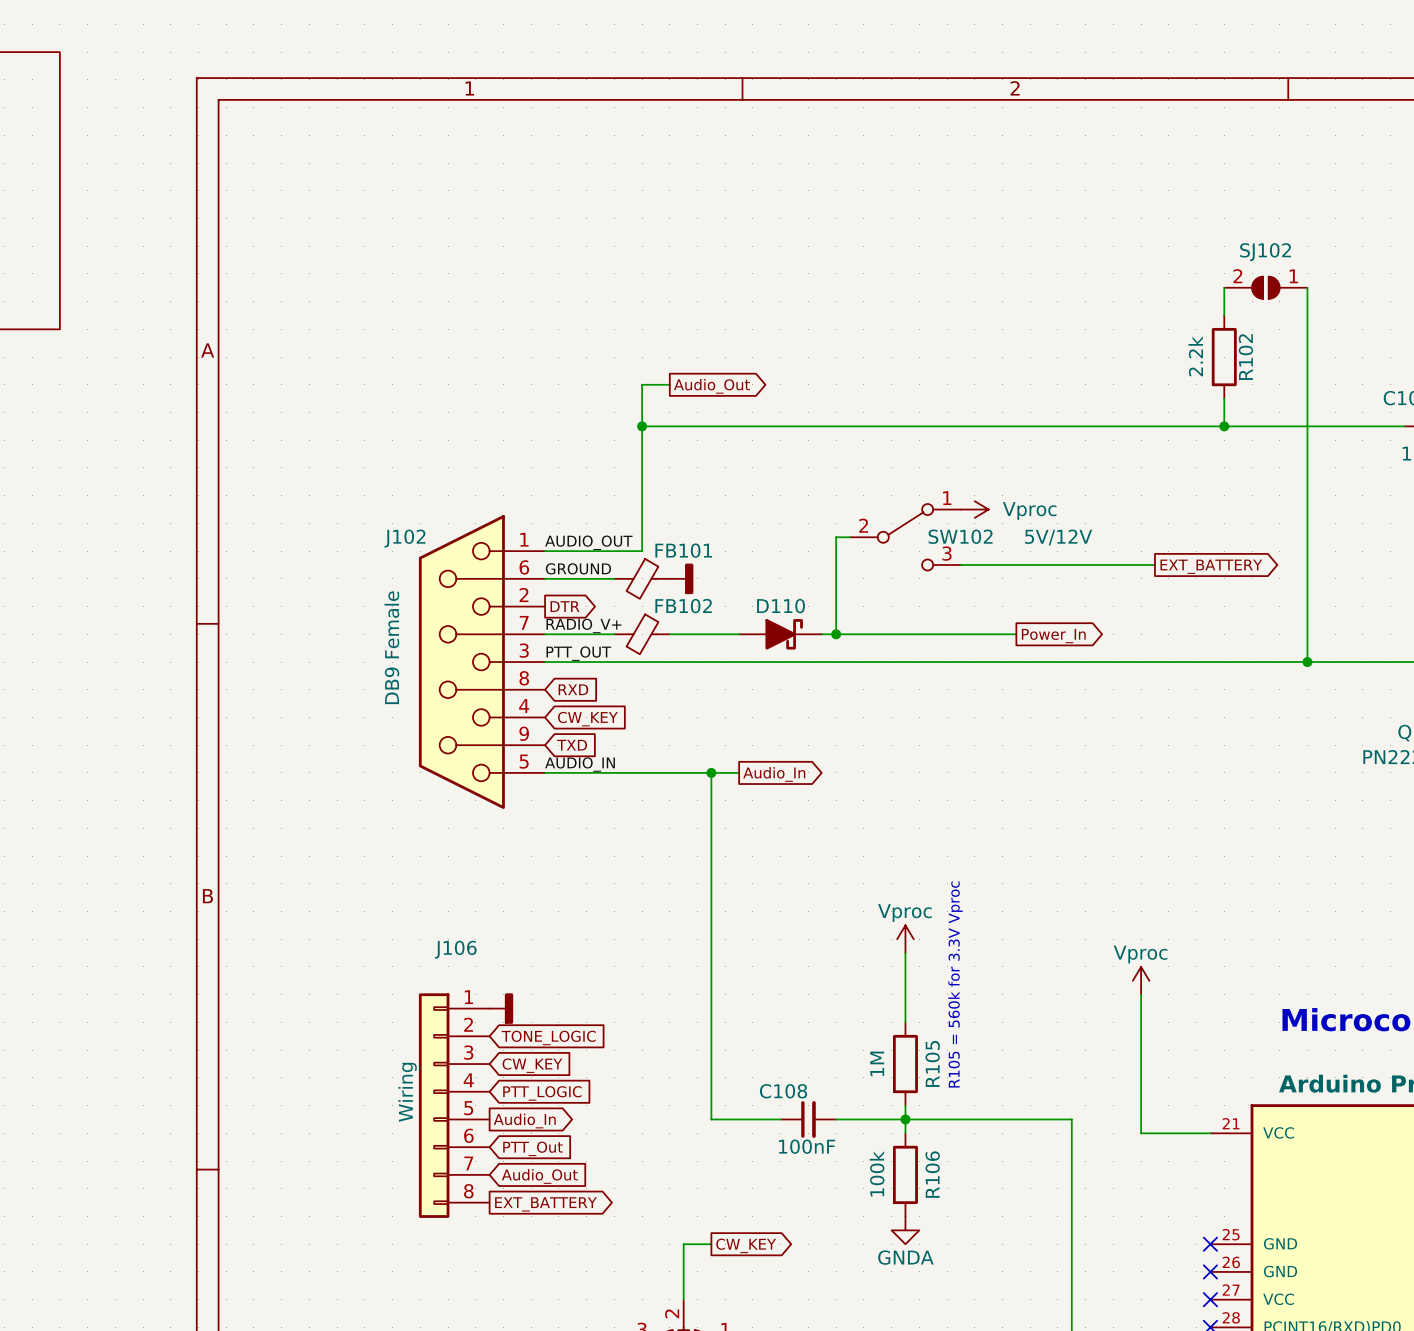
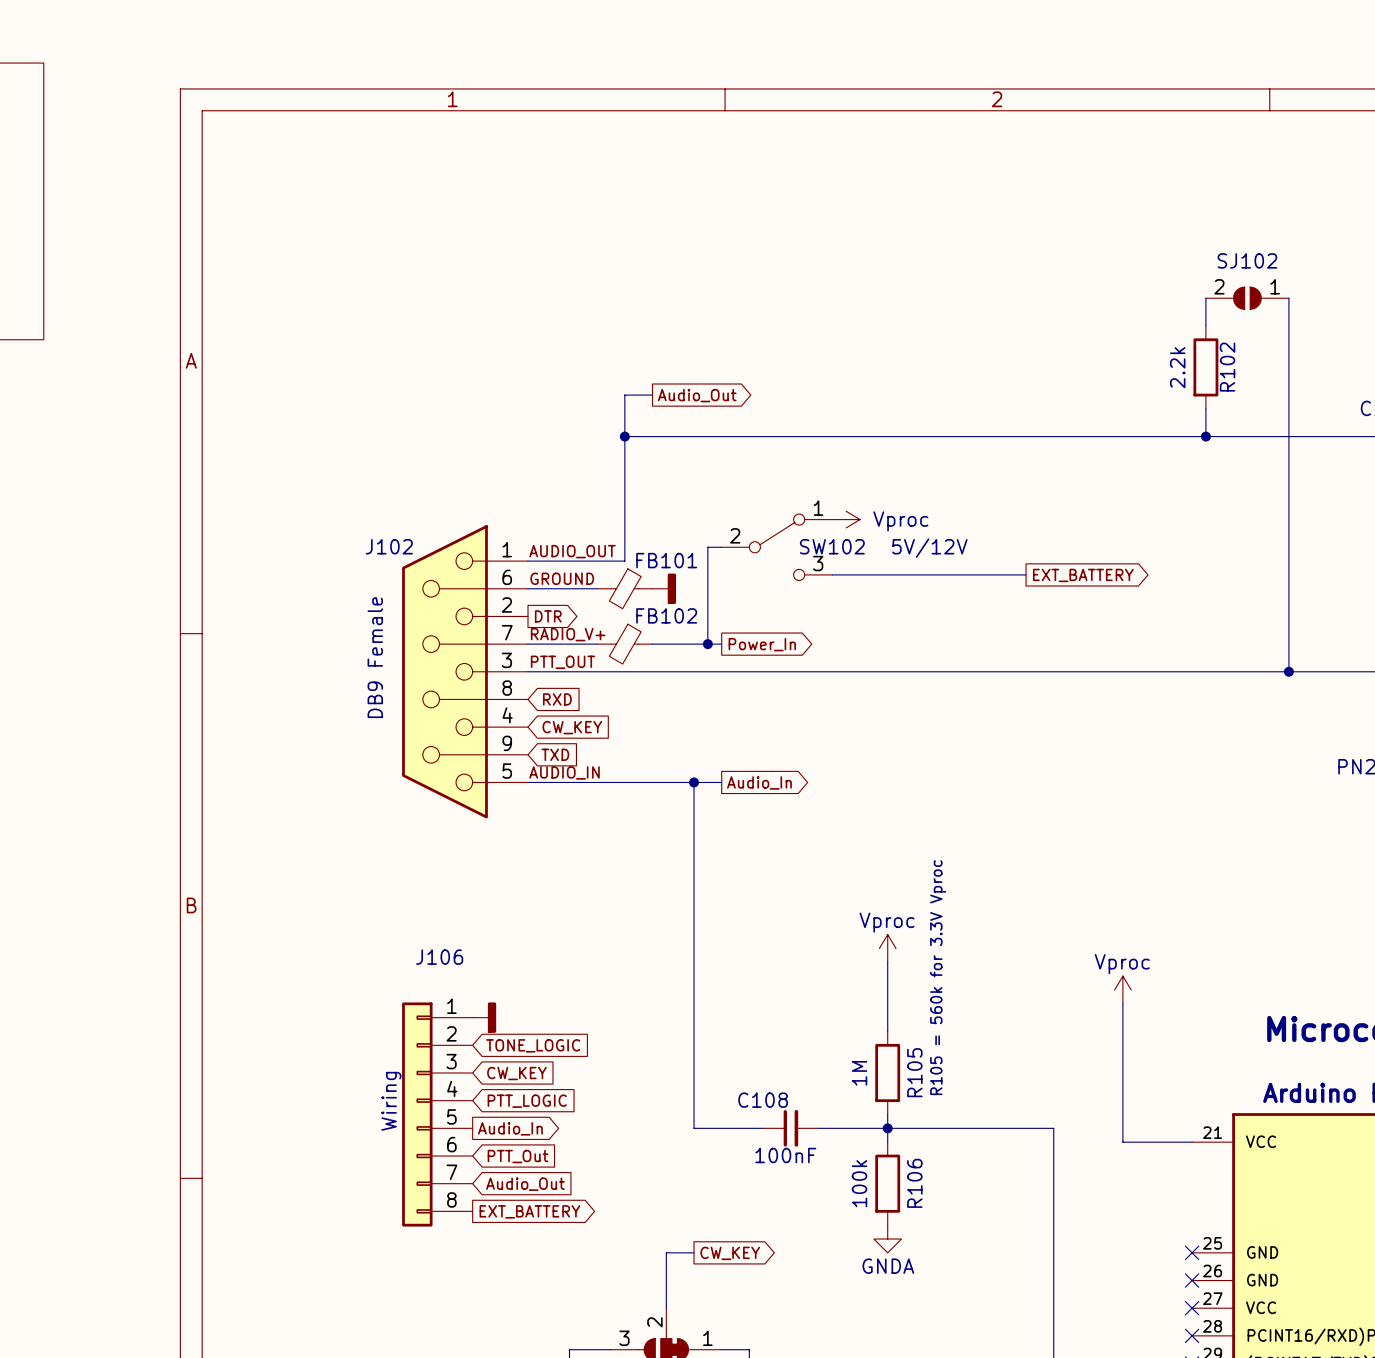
power symbol position: Vproc (974, 509) -> Vproc (846, 519)
wire: (850, 537) (836, 537) (836, 634) -> (721, 547) (707, 547) (707, 644)
SW102 position: (905, 537) -> (777, 547)
wire: (1044, 564) (1154, 564) -> (832, 574) (943, 574)
global label position: EXT_BATTERY (1211, 566) -> EXT_BATTERY (1083, 575)
junction: none -> (707, 644)
D110: (780, 634) -> none
wire: (822, 634) (1016, 634) -> none
junction: (836, 634) -> none
global label: none -> Power_In (762, 644)
global label: Power_In (1053, 636) -> none

